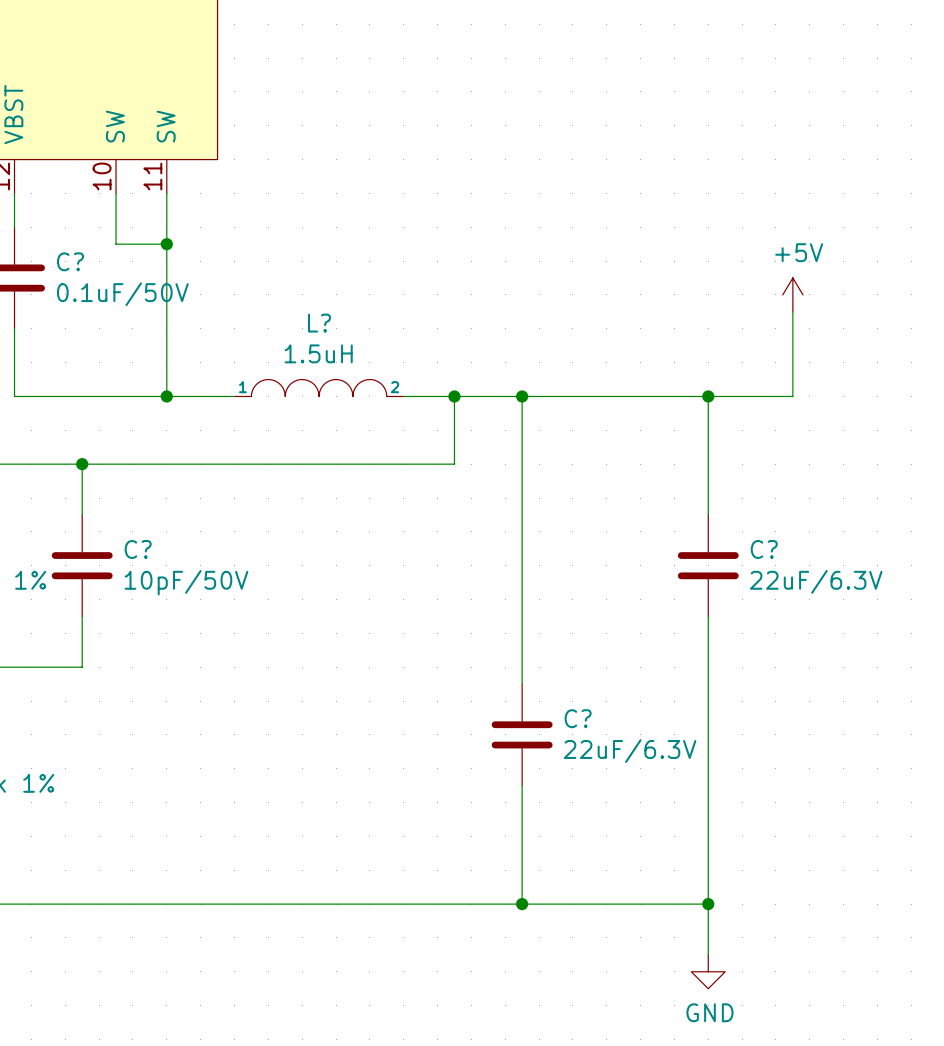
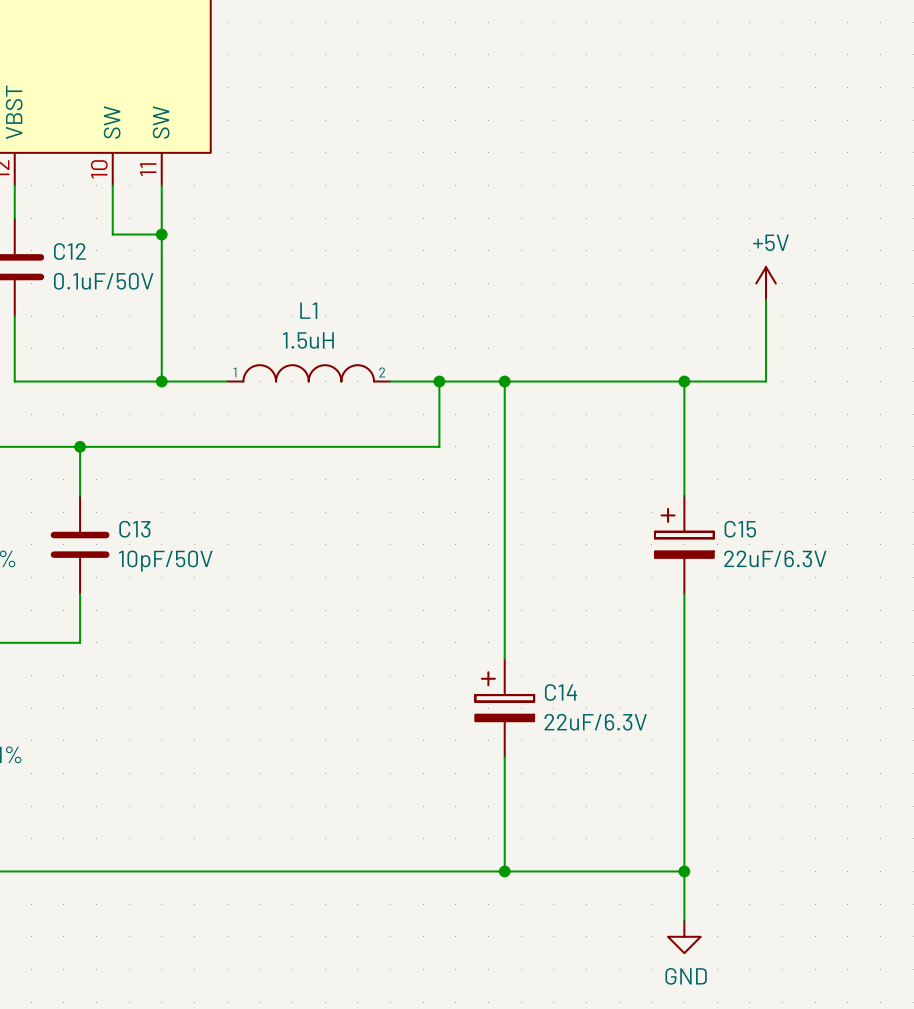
C? name: C? (70, 261) -> C12 (69, 251)
L? name: L? (319, 323) -> L1 (308, 310)
C? name: C? (138, 549) -> C13 (134, 529)
C?: 22uF/6.3V (708, 565) -> none
C15: none -> 22uF/6.3V (684, 544)
C?: 22uF/6.3V (522, 734) -> none
C14: none -> 22uF/6.3V (504, 708)

